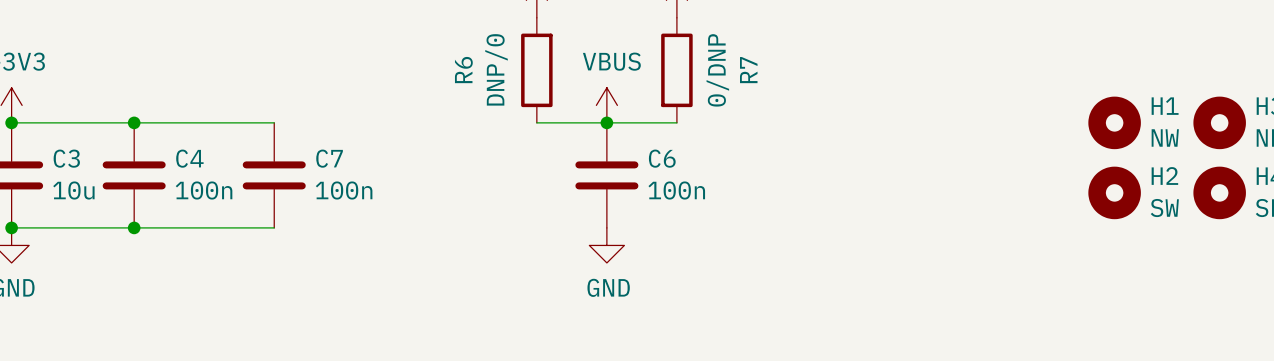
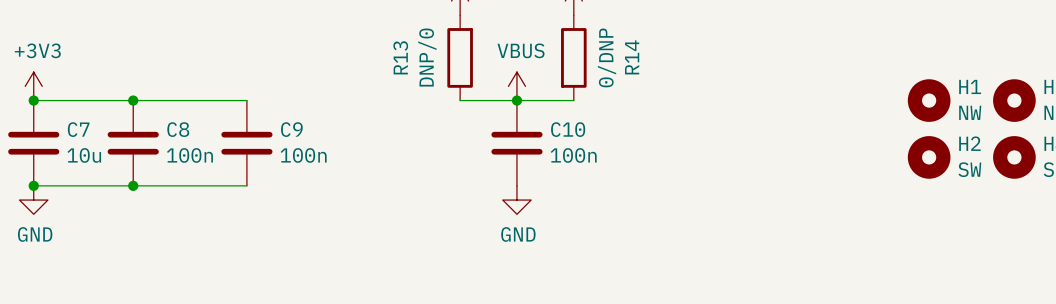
R6 name: R6 (463, 70) -> R13 (400, 57)
R7 name: R7 (748, 70) -> R14 (632, 57)
C3 name: C3 (66, 158) -> C7 (78, 129)
C4 name: C4 (189, 158) -> C8 (178, 129)
C7 name: C7 (329, 158) -> C9 (291, 129)
C6 name: C6 (662, 158) -> C10 (568, 129)

